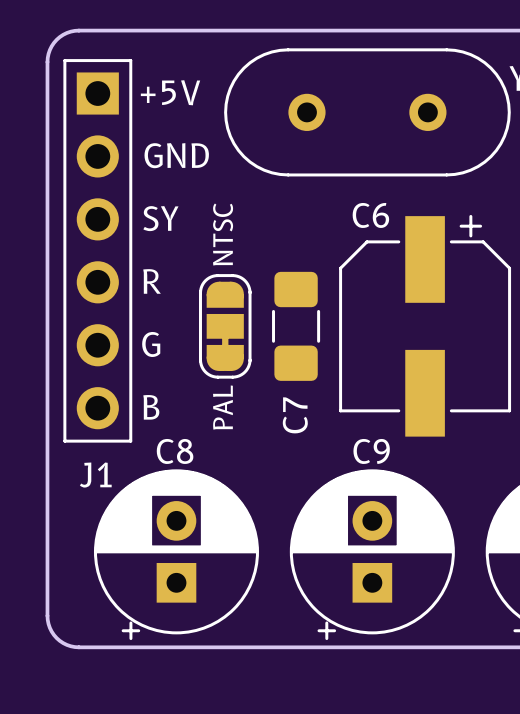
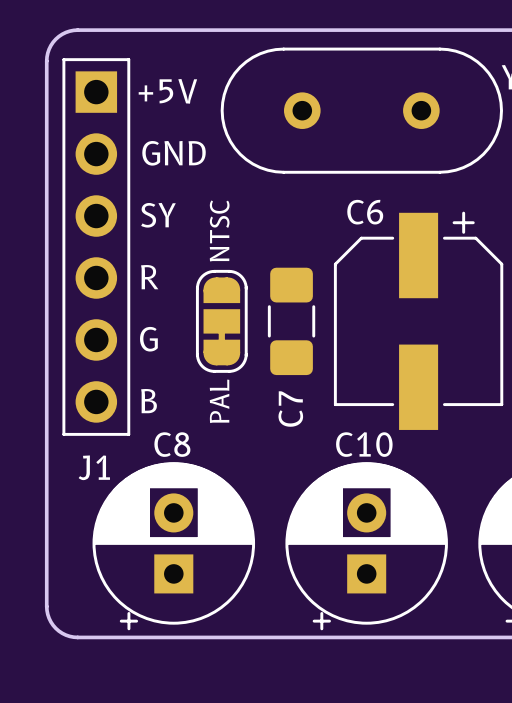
C9 name: C9 (371, 451) -> C10 (364, 444)

